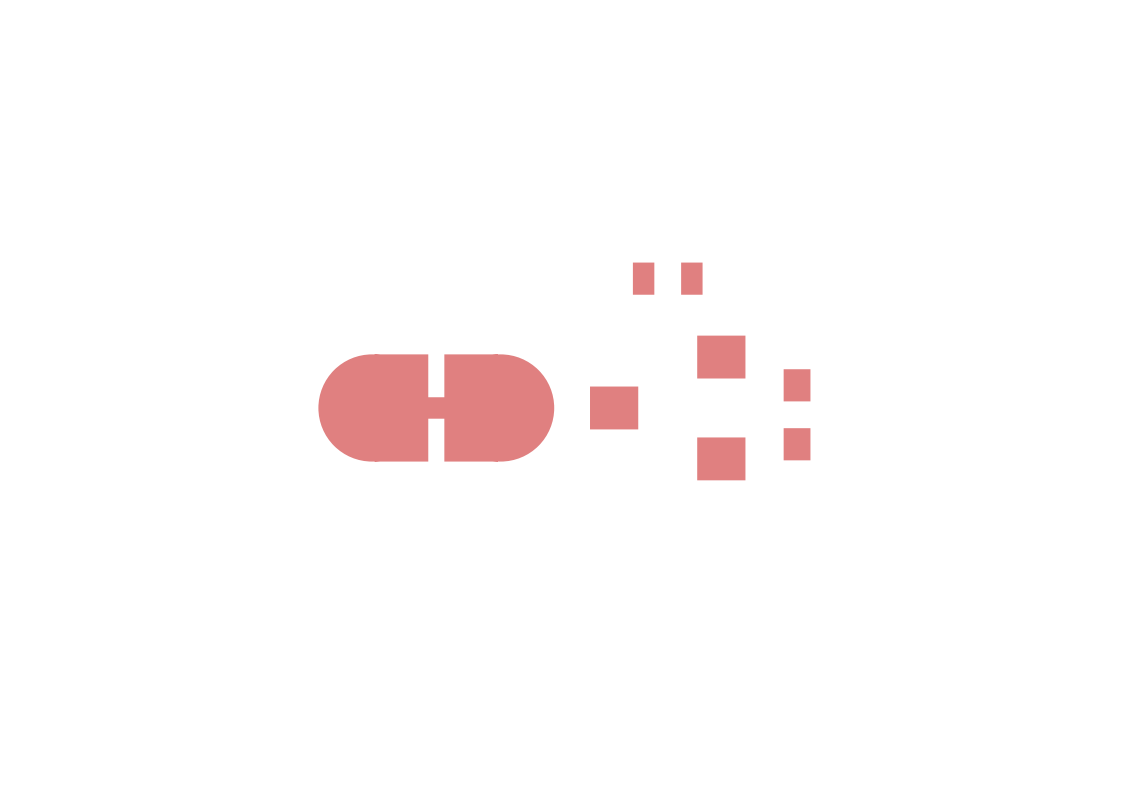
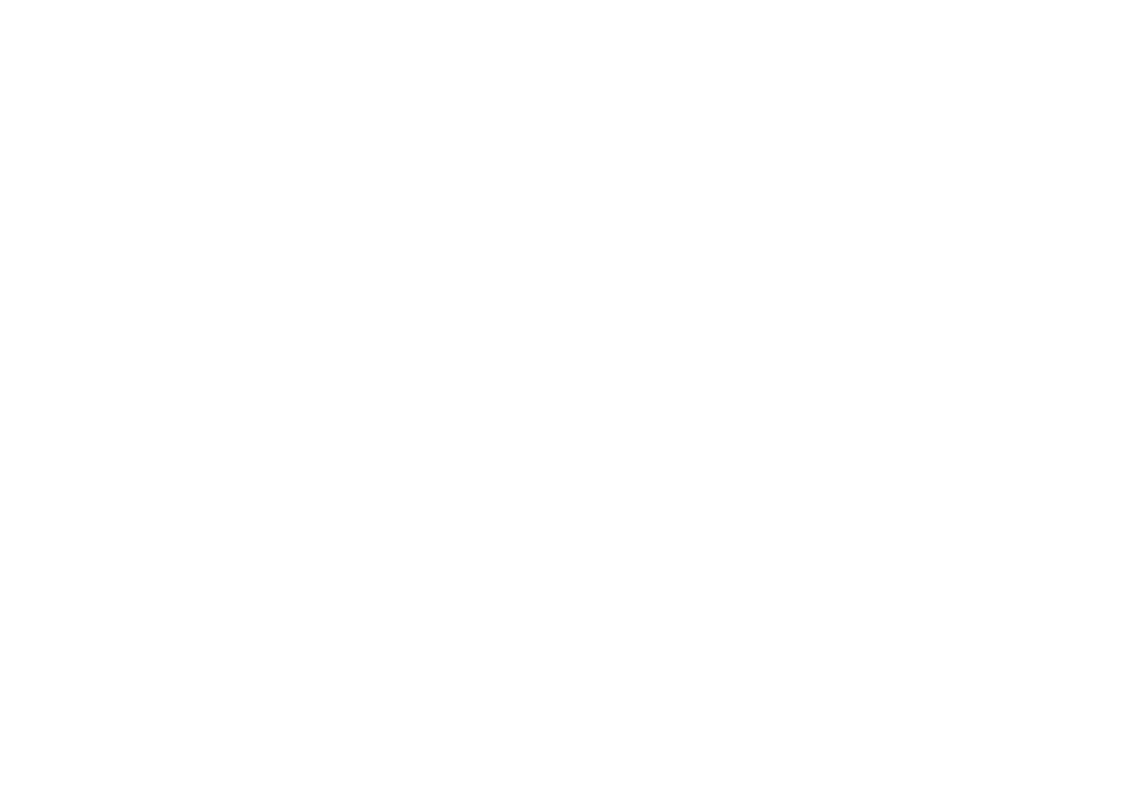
part: (667, 278) -> none
part: (436, 407) -> none
part: (667, 407) -> none
part: (797, 414) -> none

